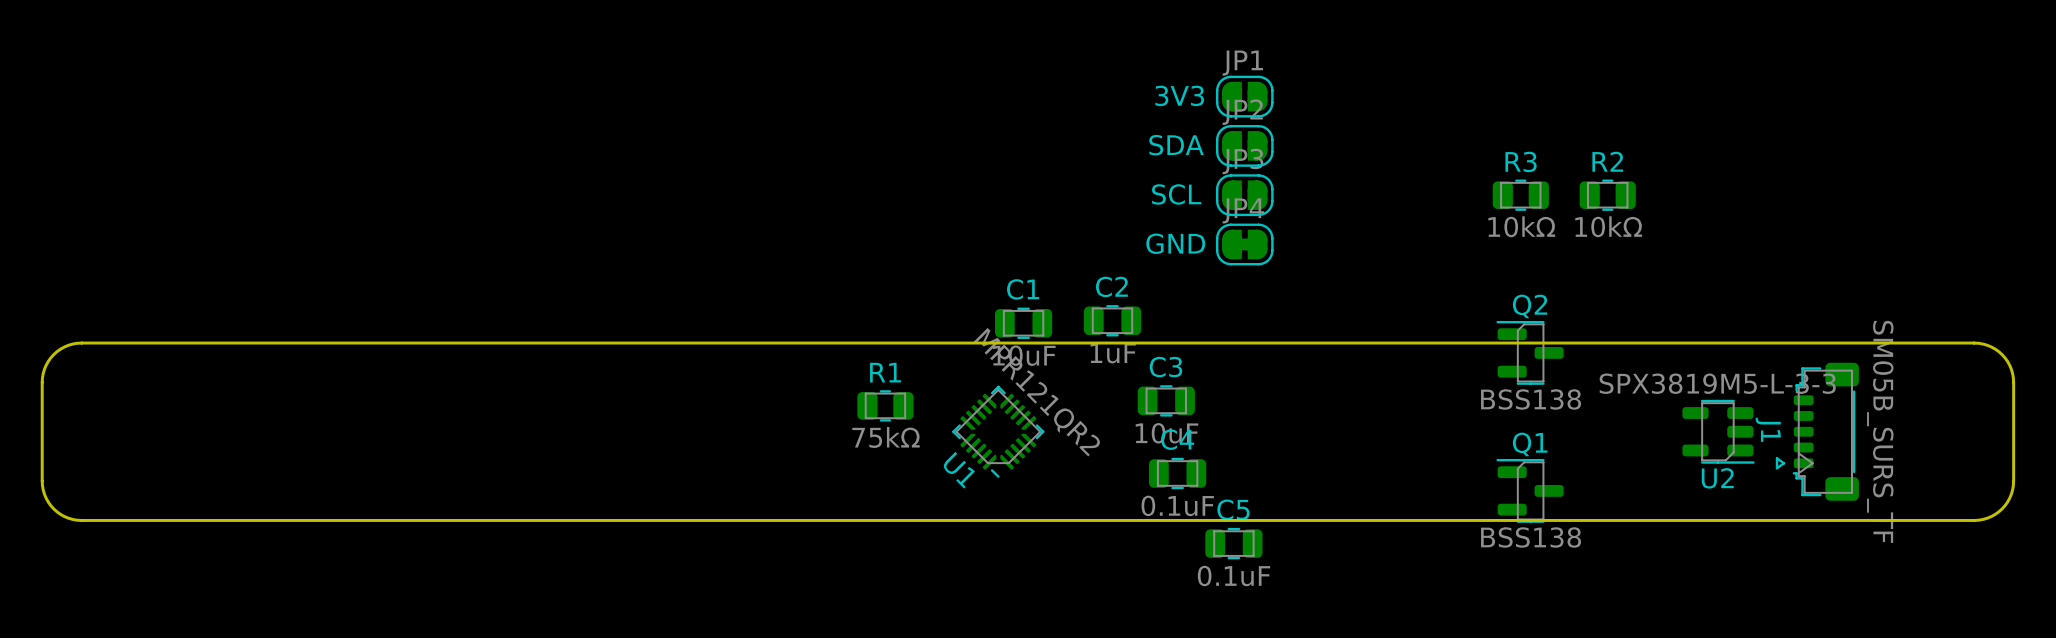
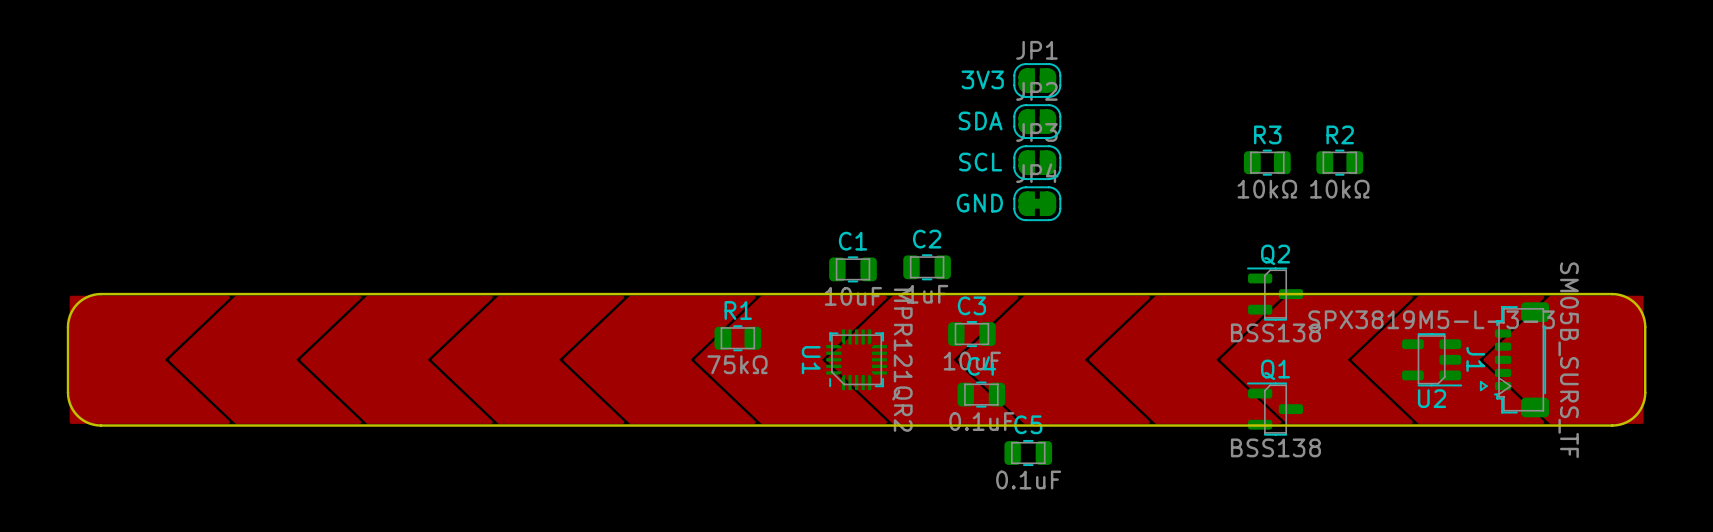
board edge: (1974, 343) (77, 343) (64, 346) (53, 354) (43, 373) (42, 485) (46, 498) (53, 508) (64, 516) (81, 520) (1978, 520) (1998, 511) (2007, 502) (2012, 489) (2013, 382) (2011, 369) (2002, 354) (1991, 346) (1974, 343) -> (1612, 294) (1623, 295) (1635, 303) (1641, 312) (1645, 326) (1645, 392) (1643, 403) (1632, 418) (1616, 425) (100, 425) (86, 422) (77, 415) (71, 406) (68, 396) (68, 319) (73, 309) (80, 301) (97, 294) (1612, 294)
drawing: none -> [69, 295, 1644, 424]
U1 rotation: 0° (998, 431) -> 45° clockwise (856, 359)

